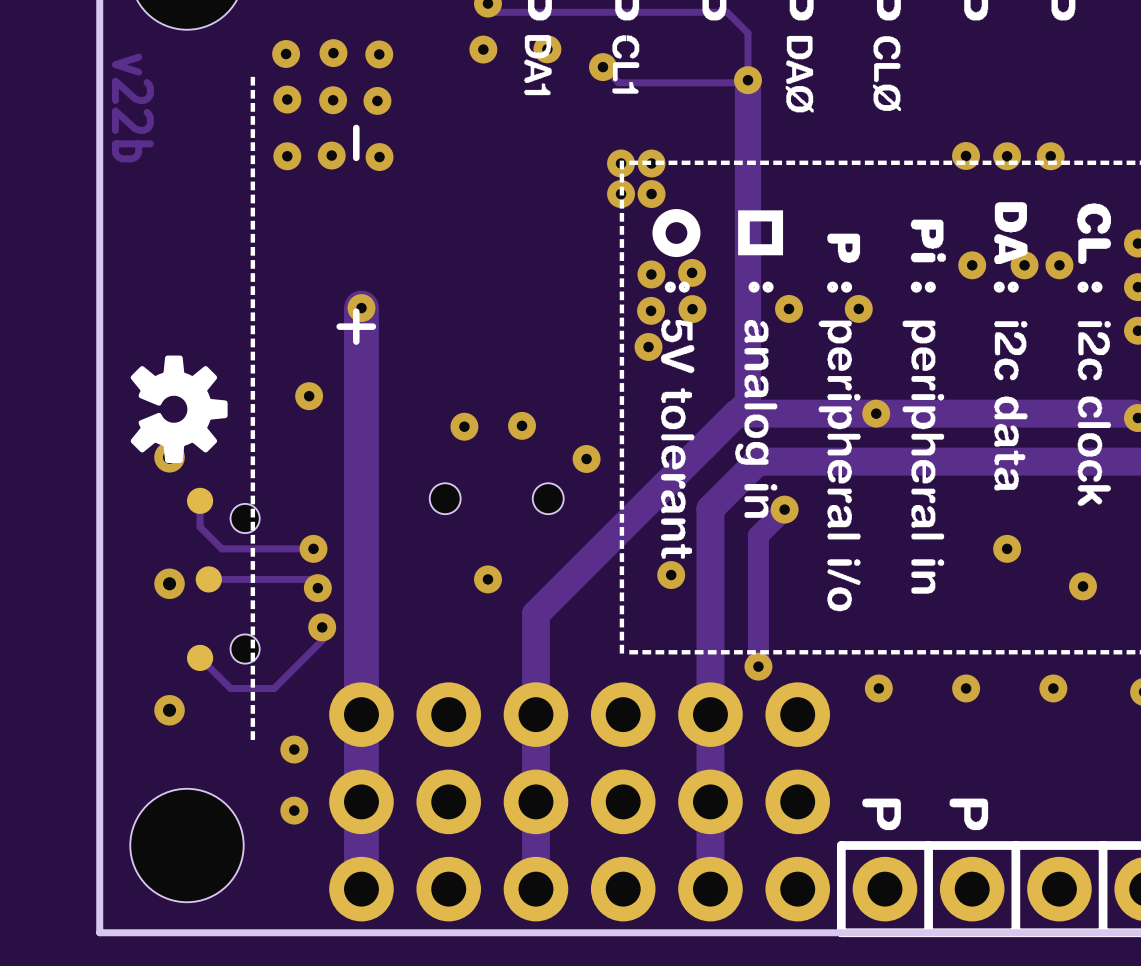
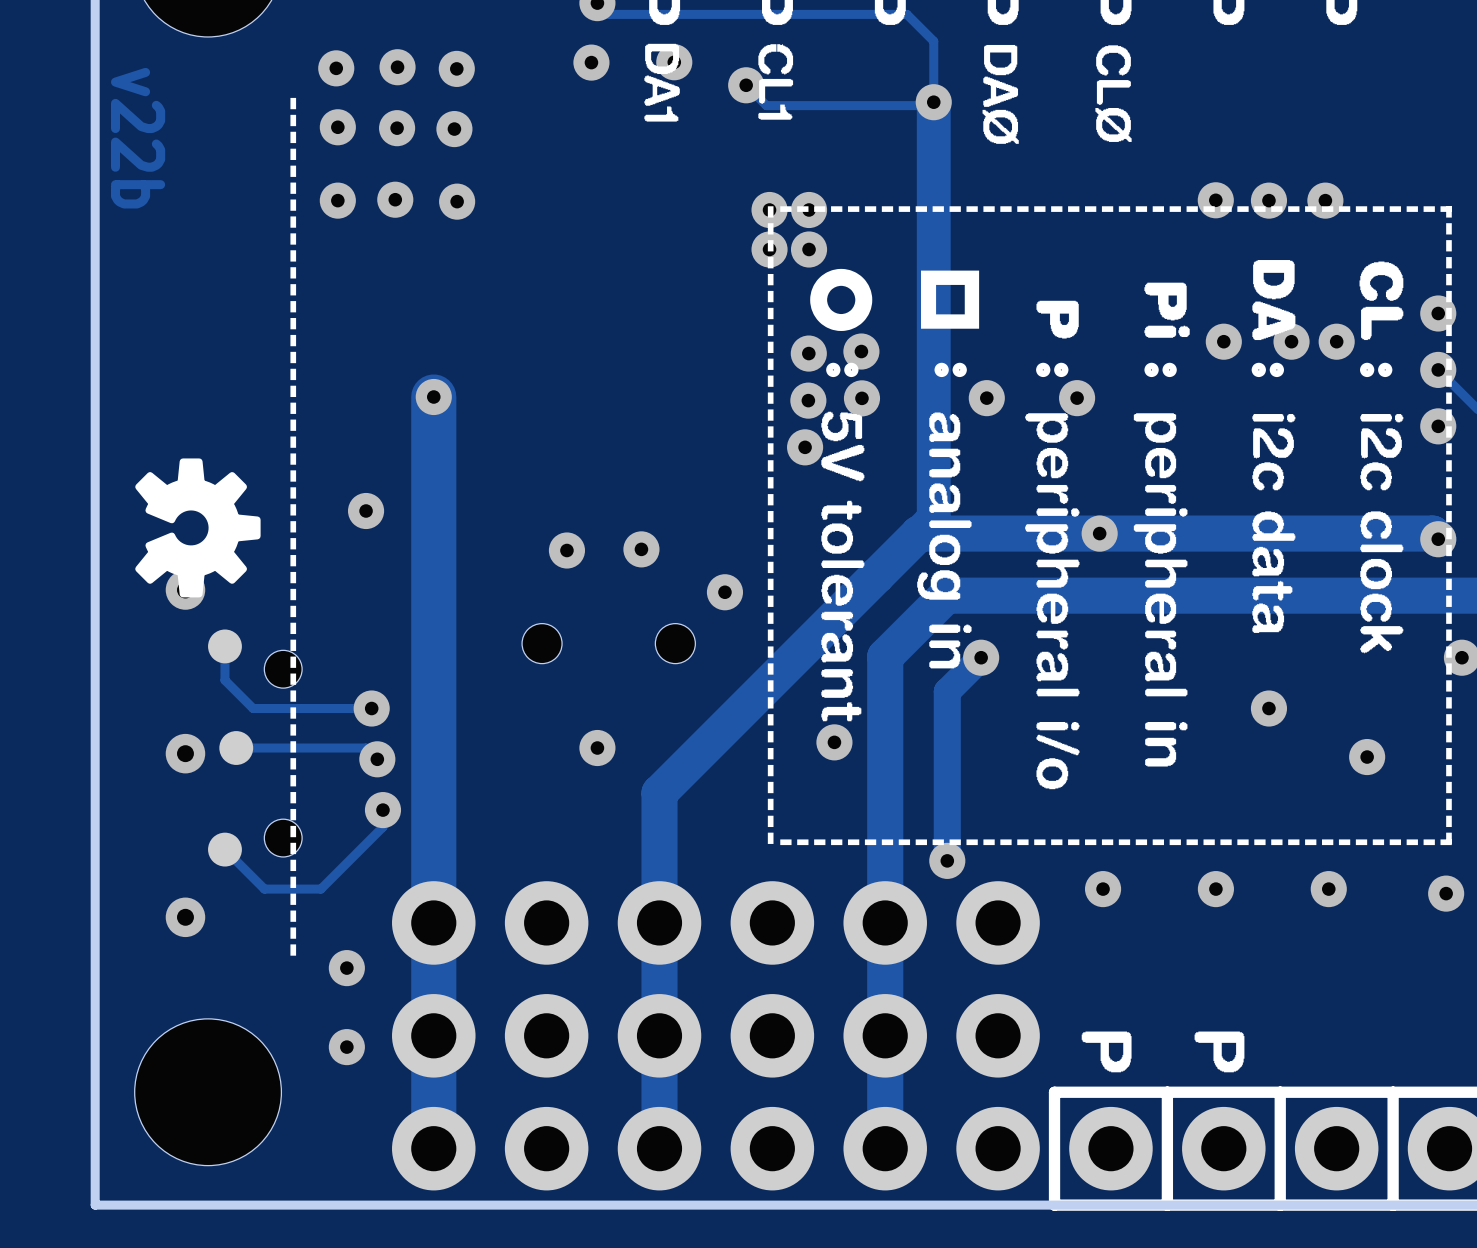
part: (356, 234) -> none

